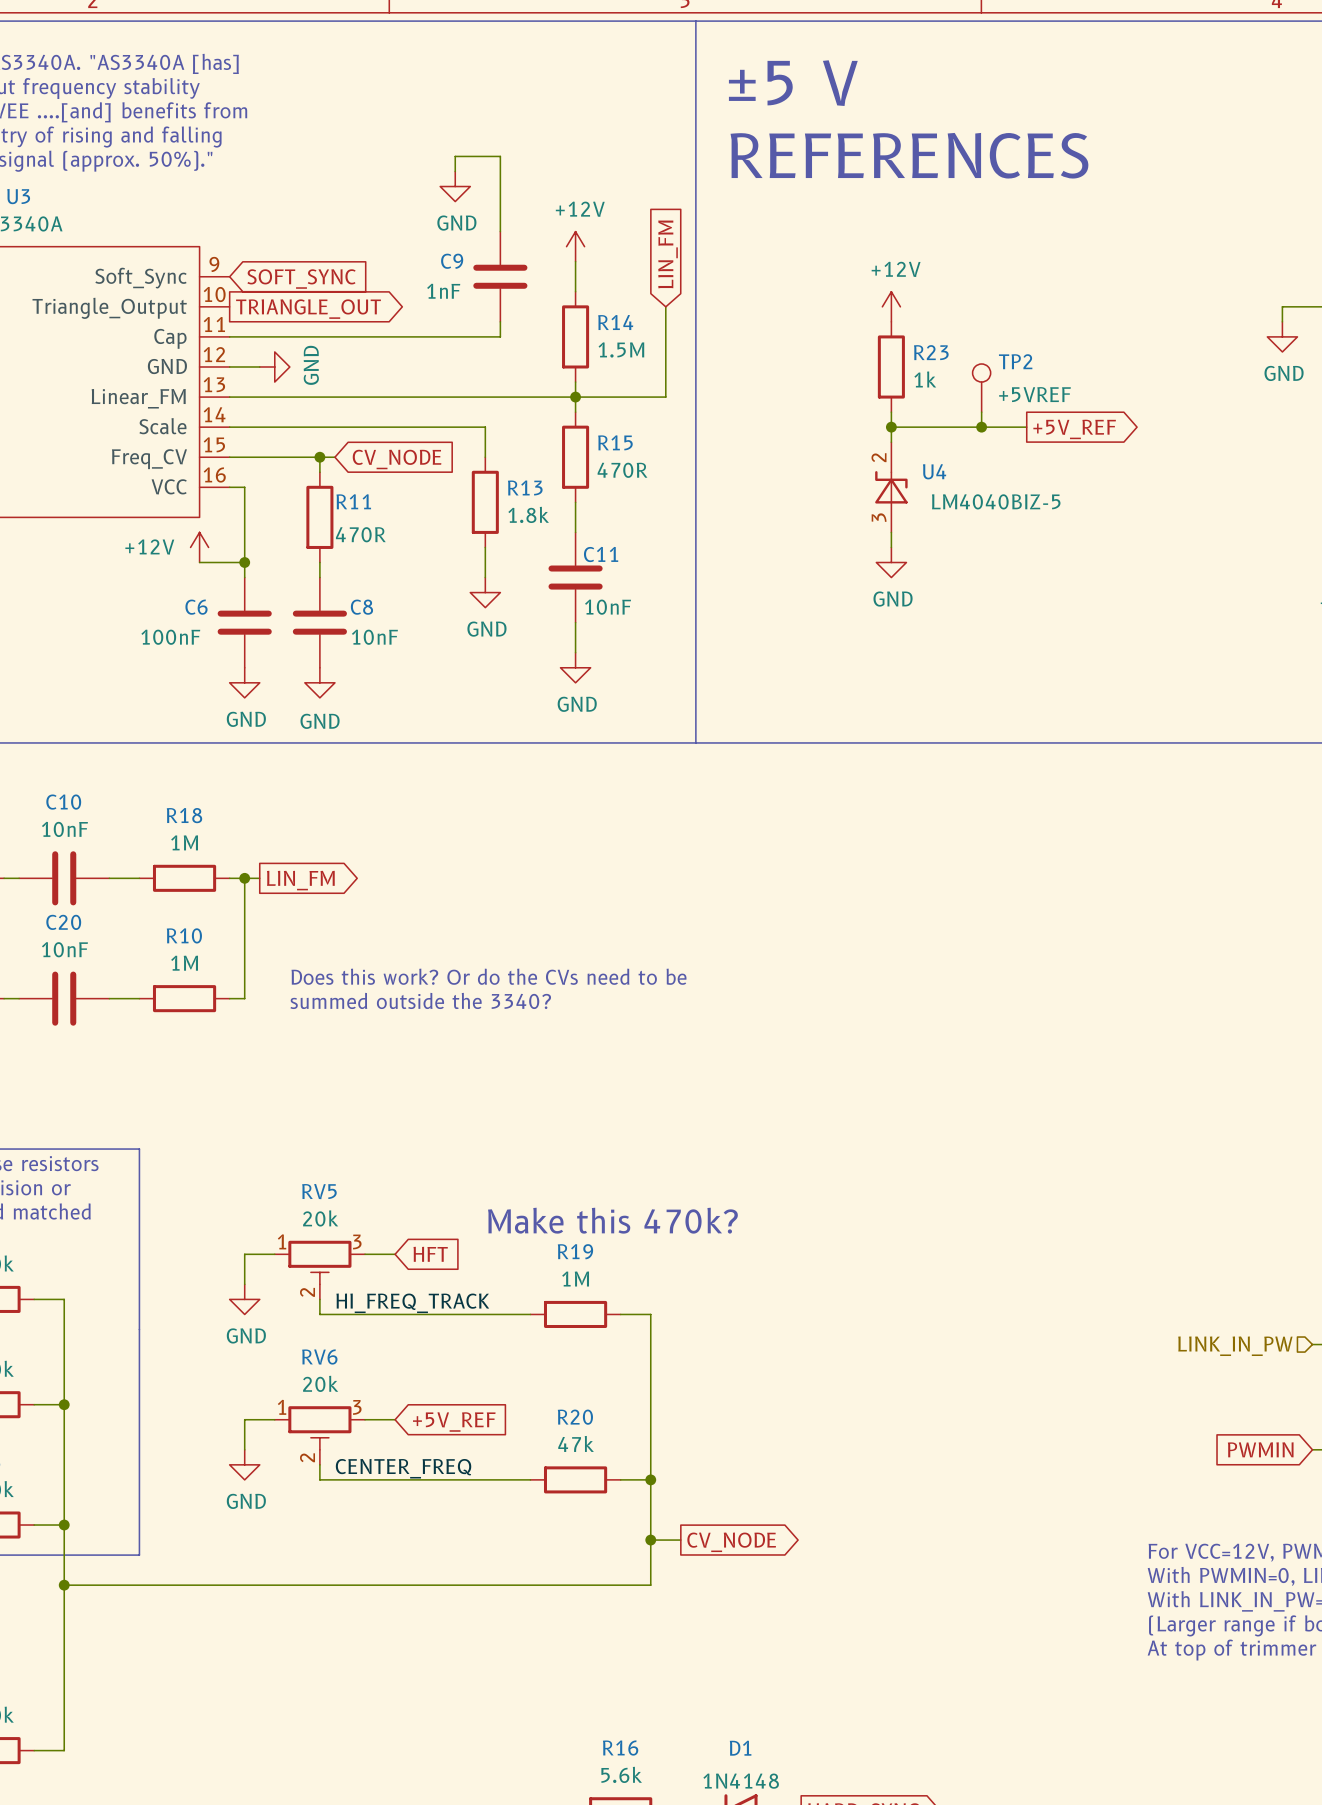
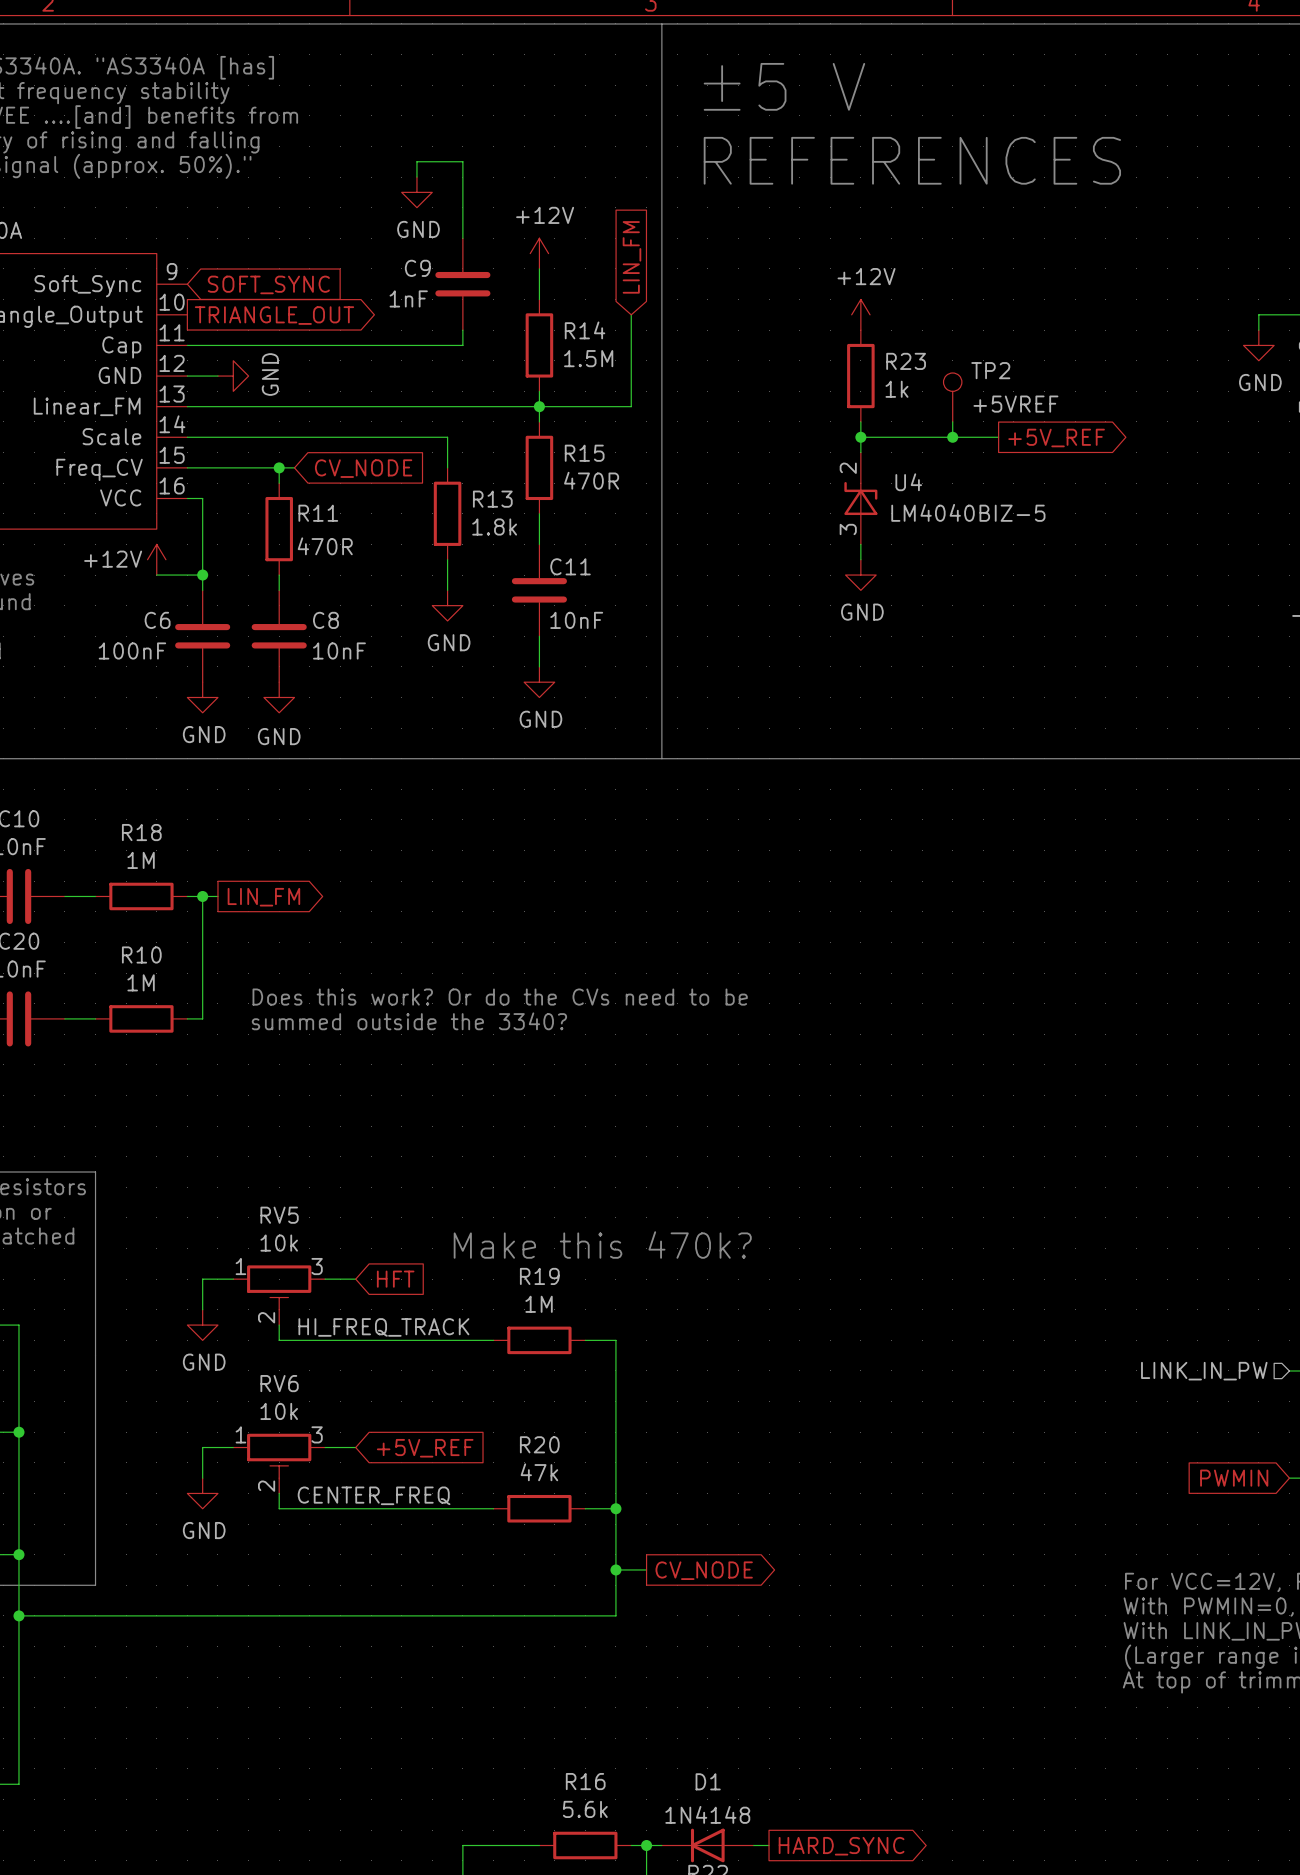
RV5 value: 20k (320, 1218) -> 10k (279, 1243)
RV6 value: 20k (320, 1383) -> 10k (279, 1411)

